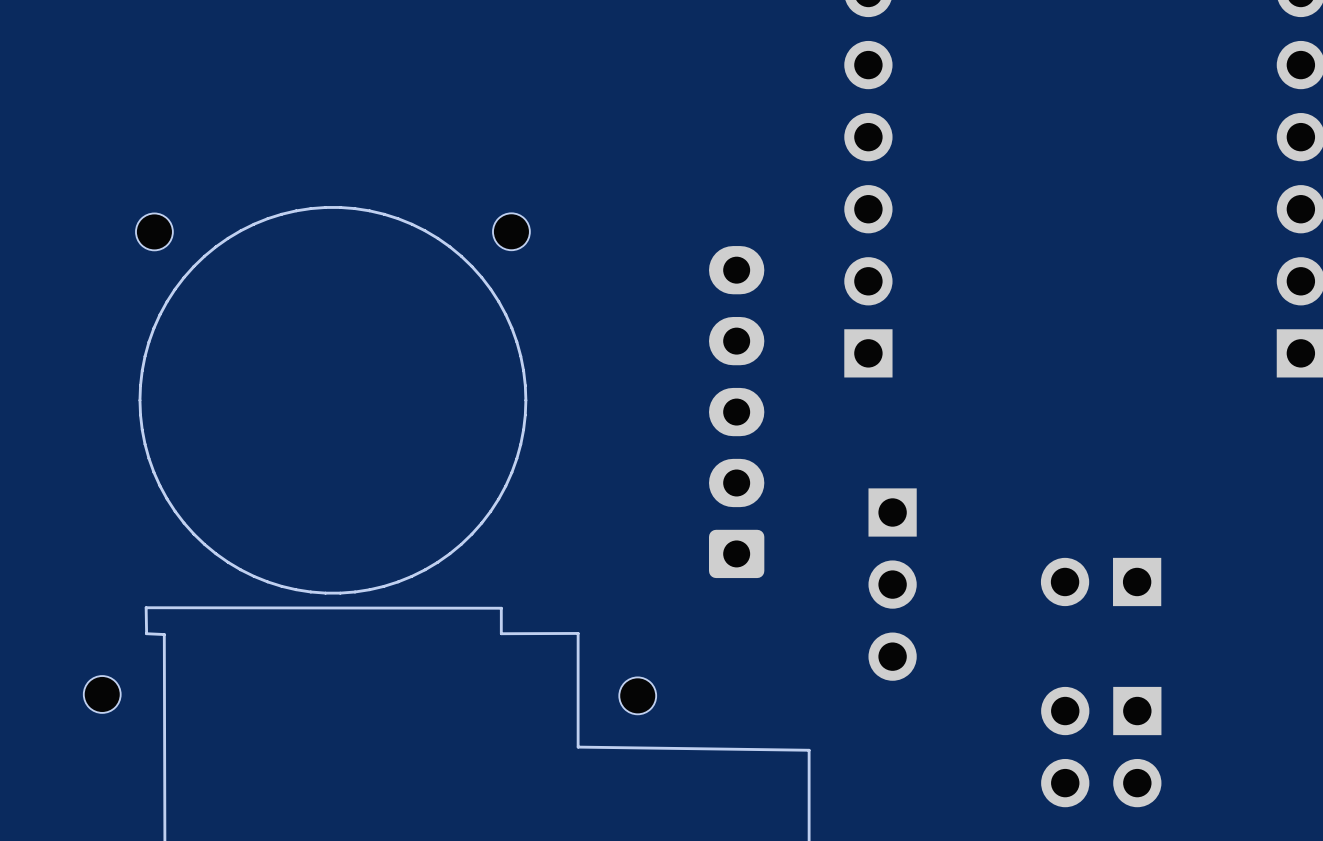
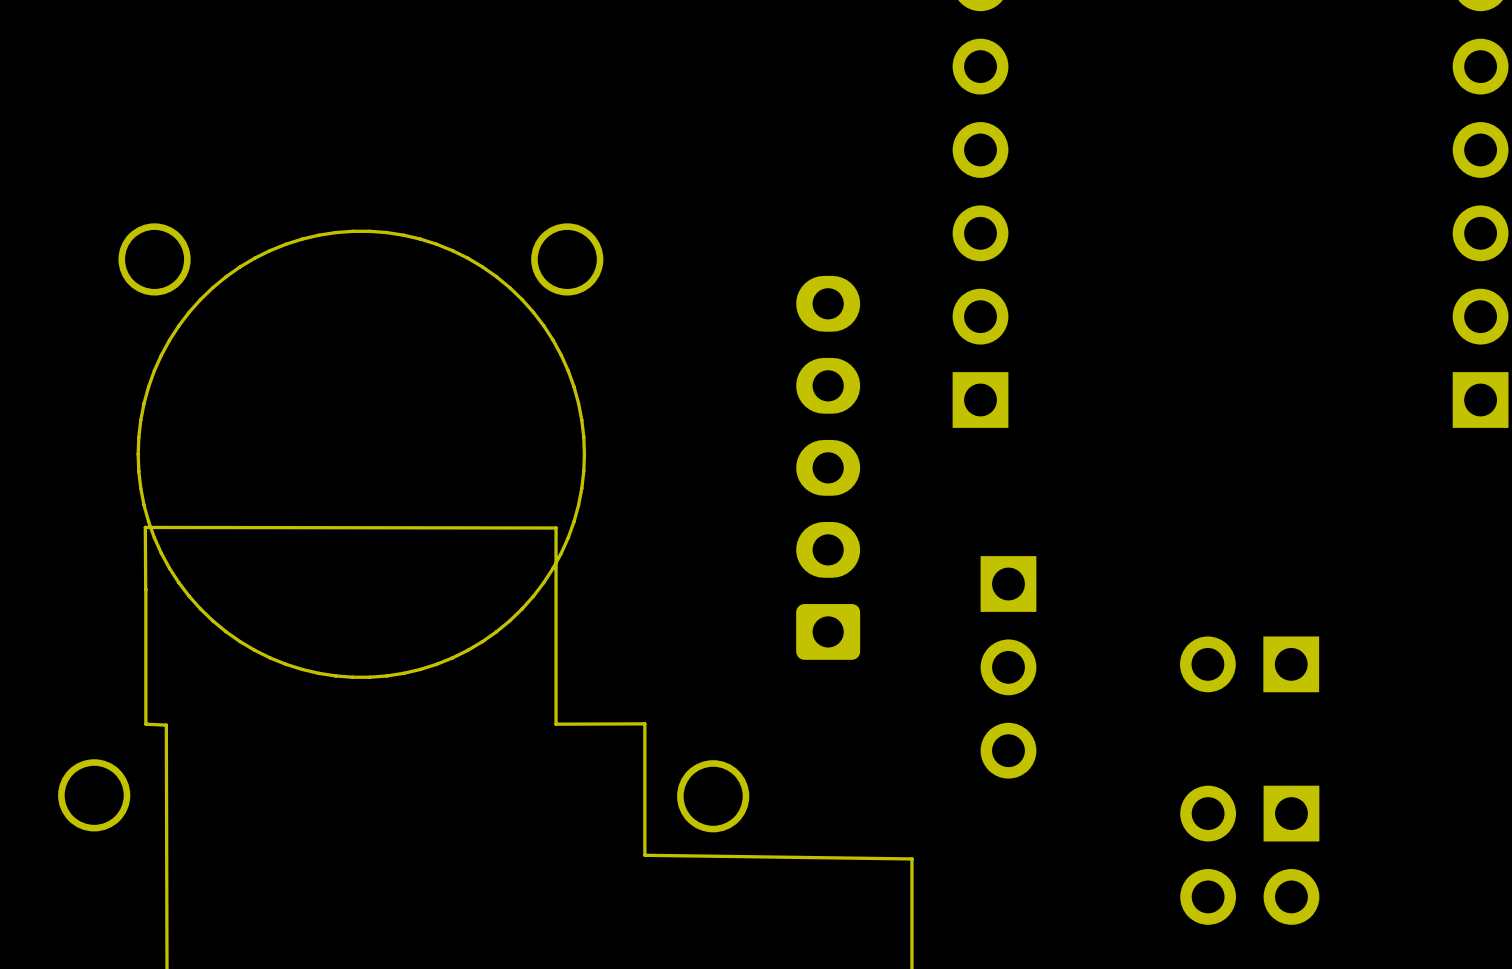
round board edge: none -> [118, 223, 191, 296]
round board edge: none -> [531, 223, 604, 296]
part: (154, 231) -> none
part: (511, 231) -> none
board edge: (501, 608) (146, 607) (146, 633) -> (556, 694) (556, 528) (145, 527) (145, 724)
round board edge: none -> [58, 759, 131, 832]
round board edge: none -> [677, 760, 750, 833]
part: (102, 694) -> none
part: (637, 695) -> none

